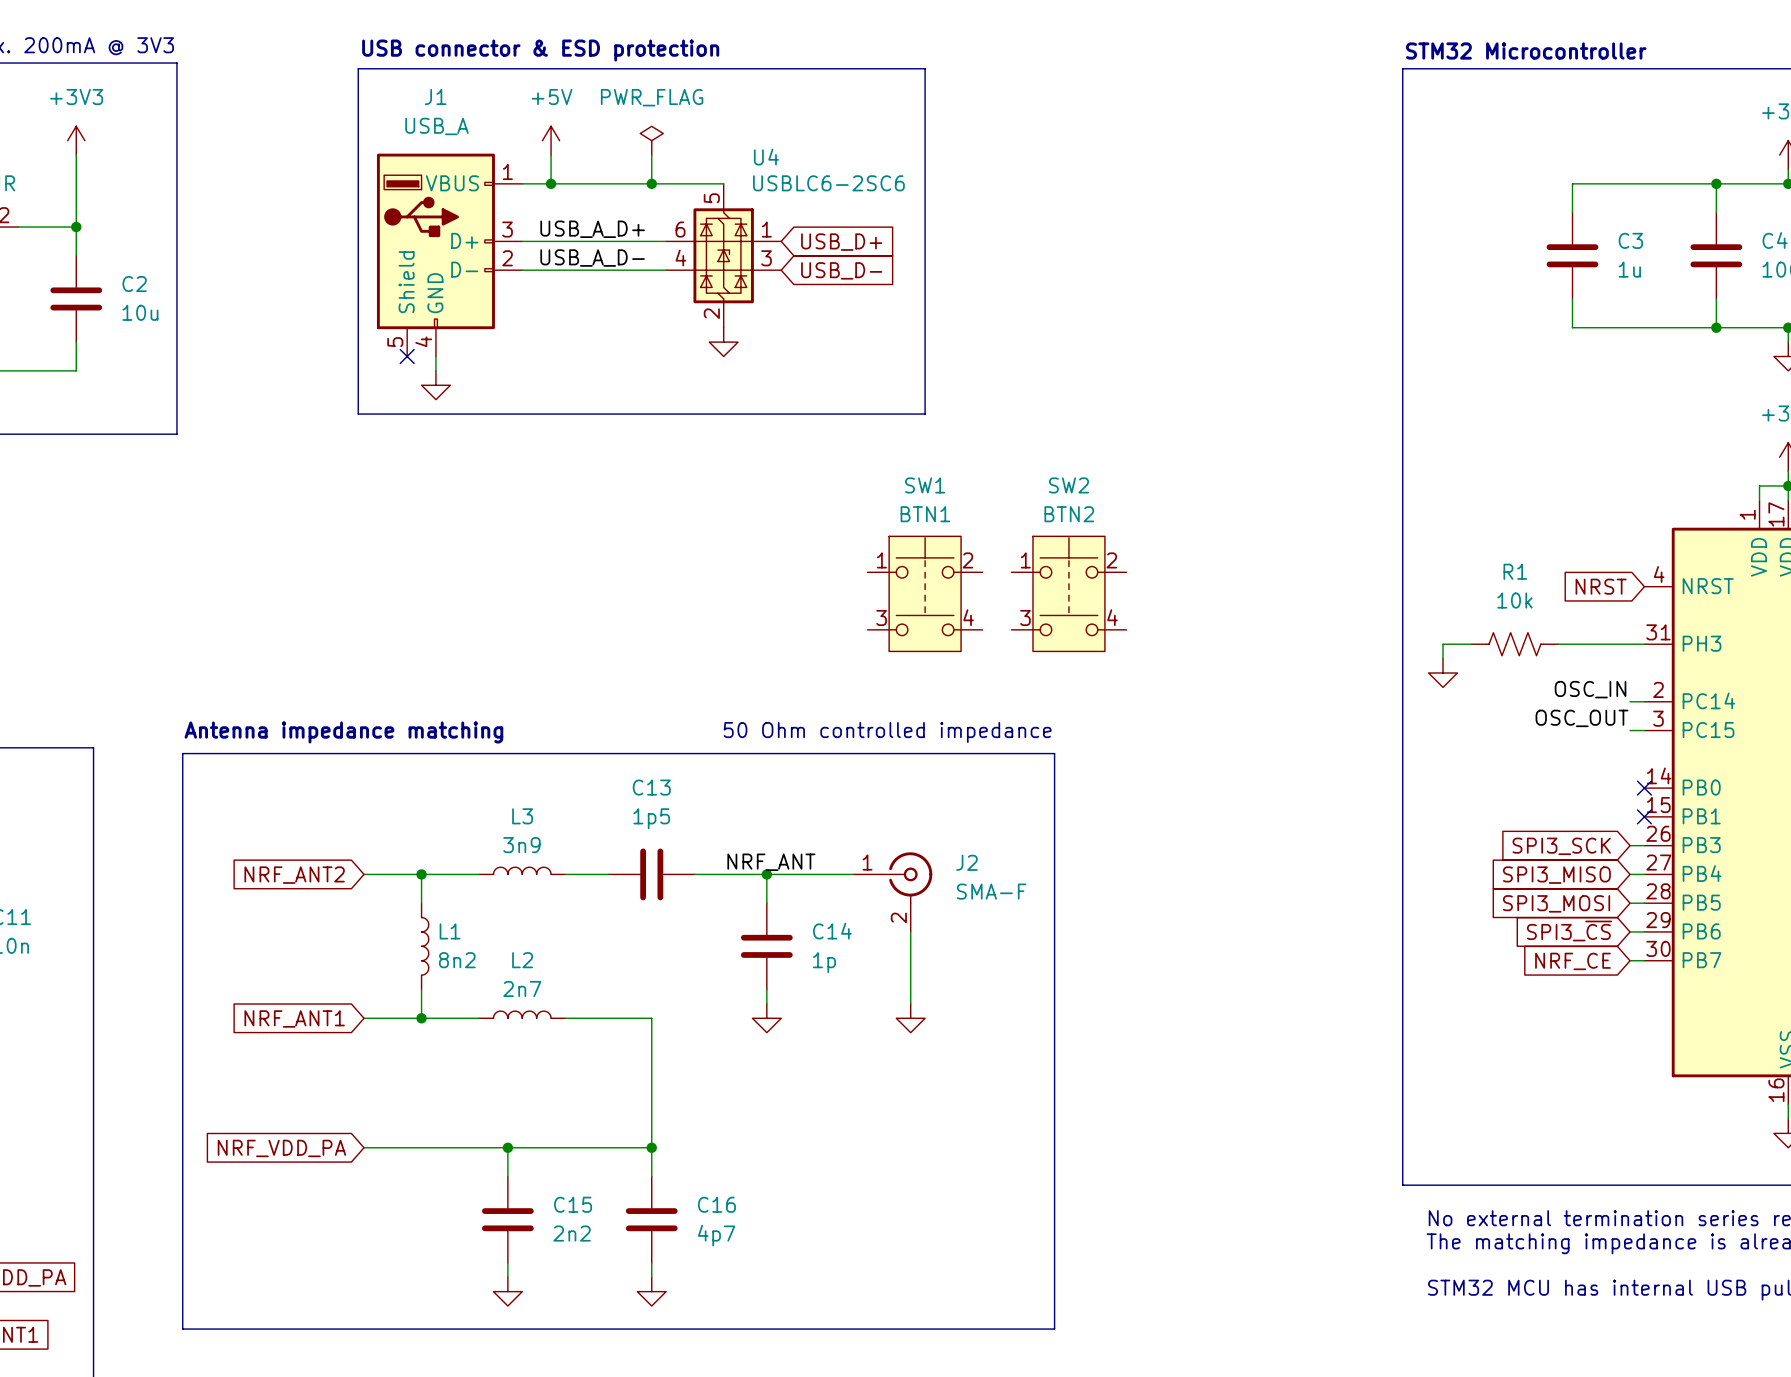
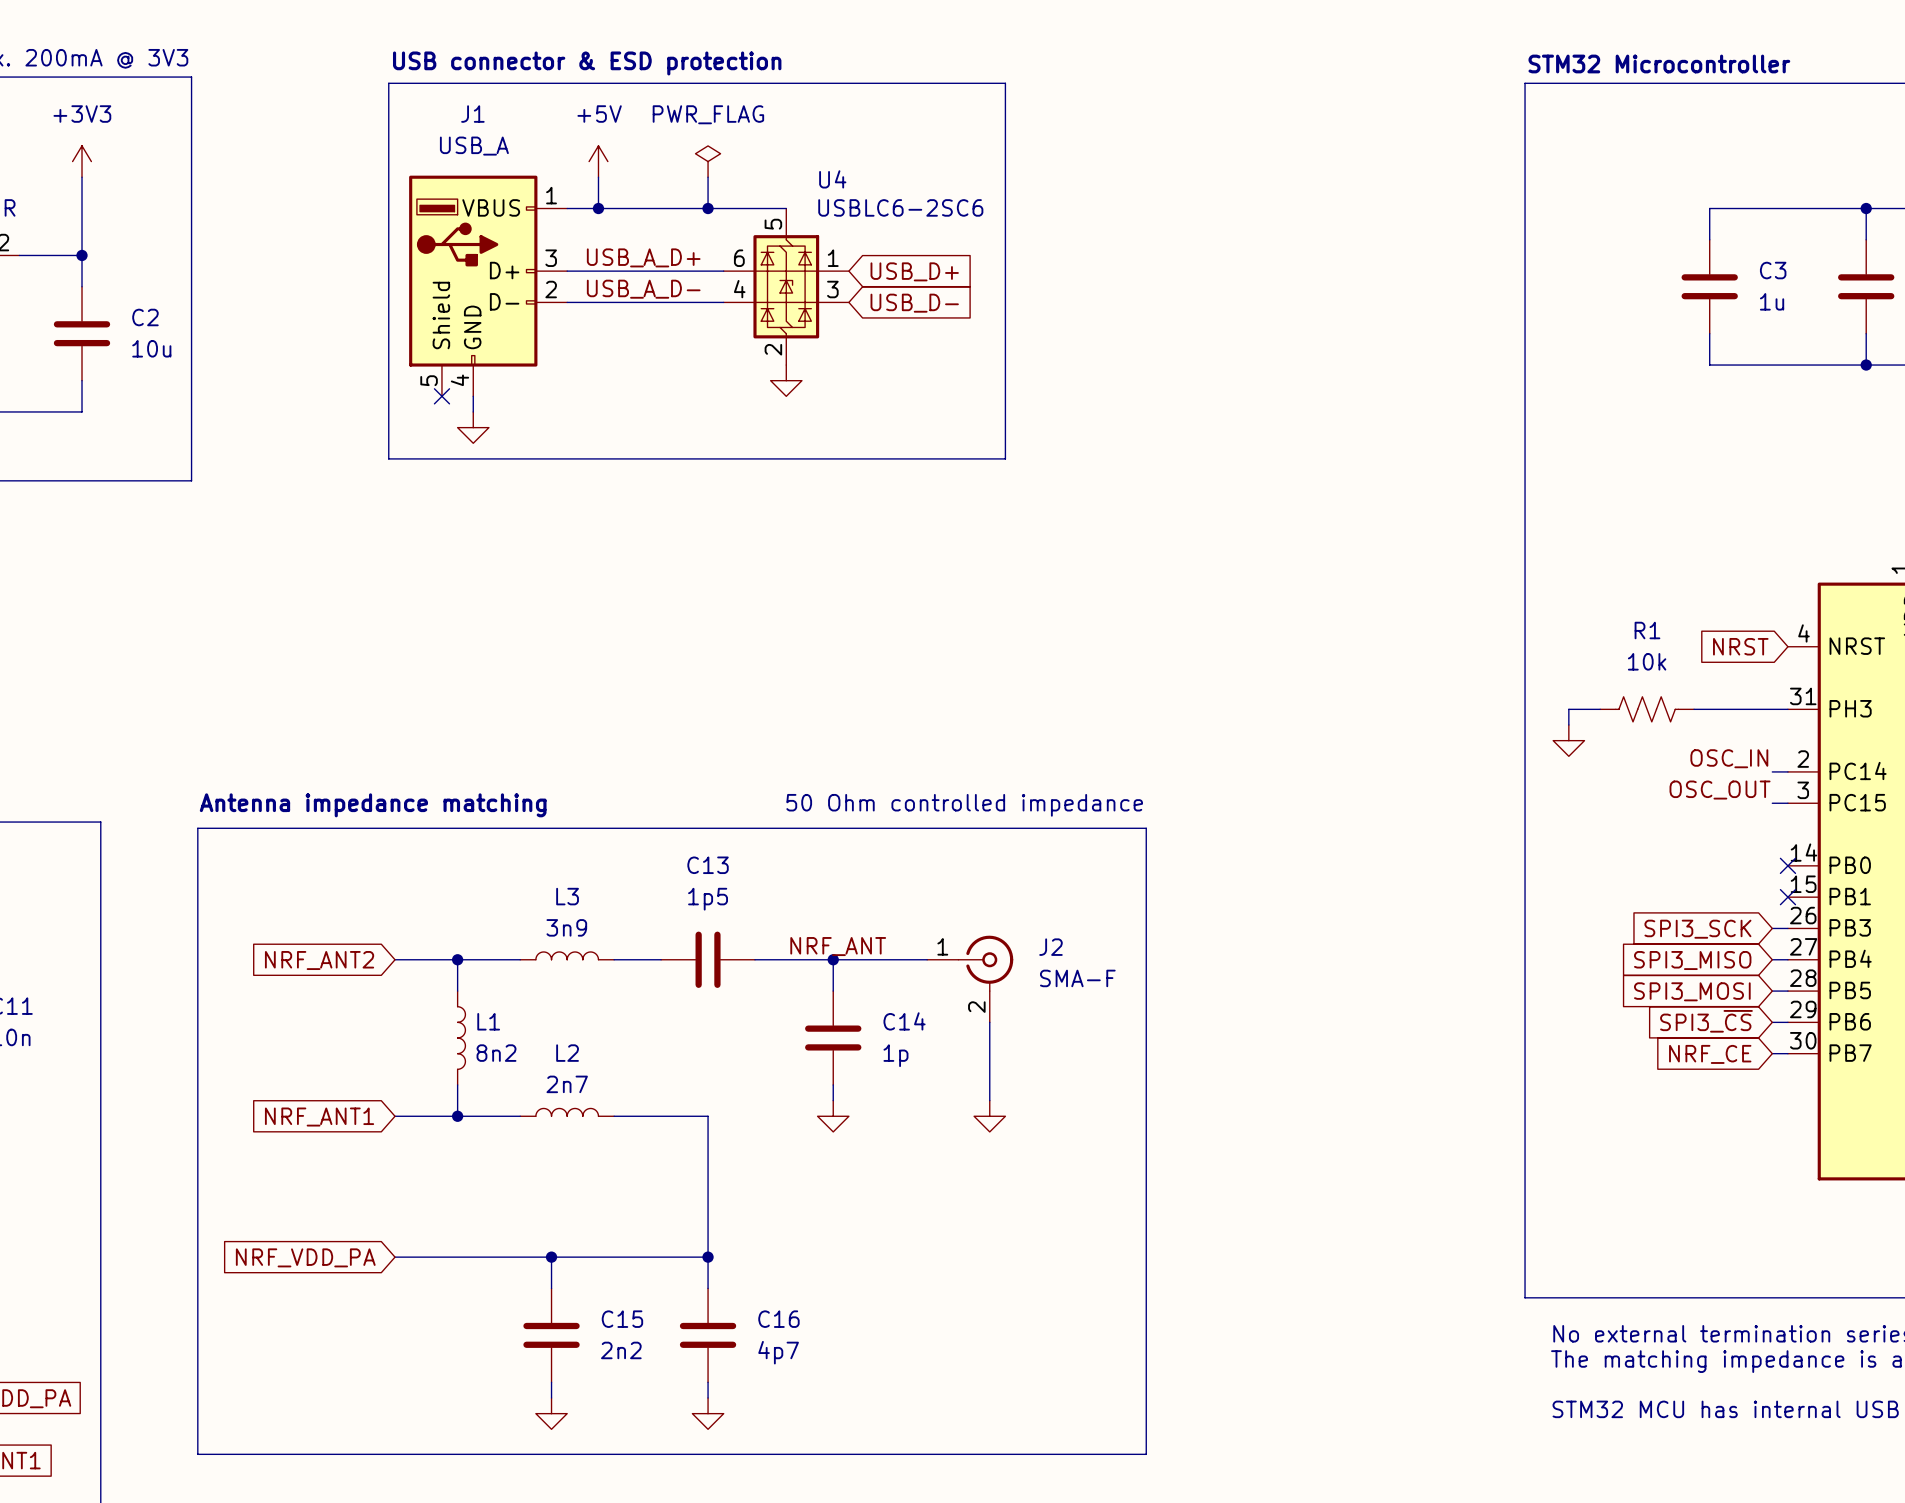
SW1: BTN1 (925, 593) -> none
SW2: BTN2 (1068, 593) -> none

